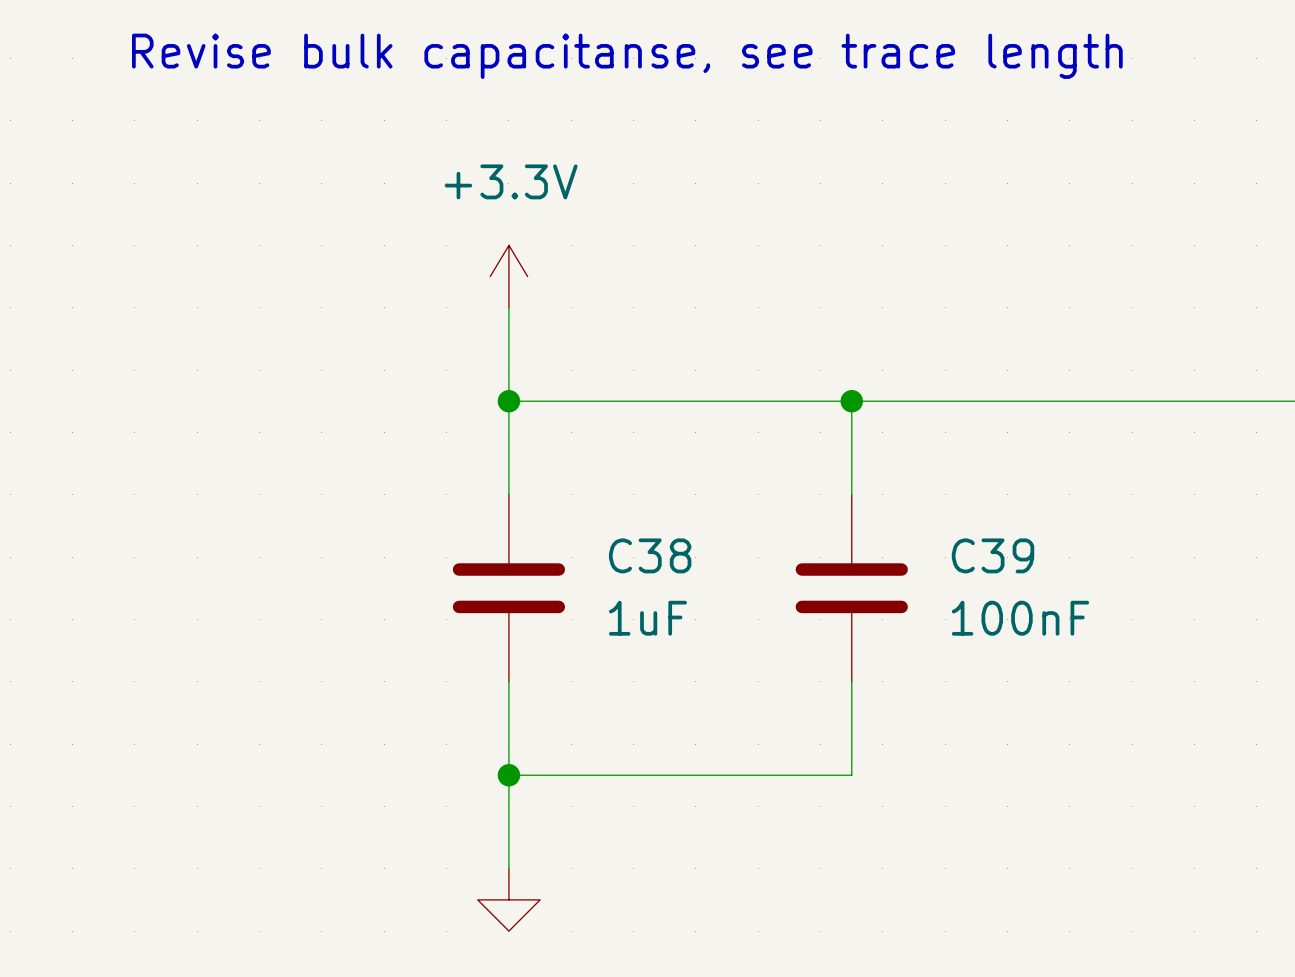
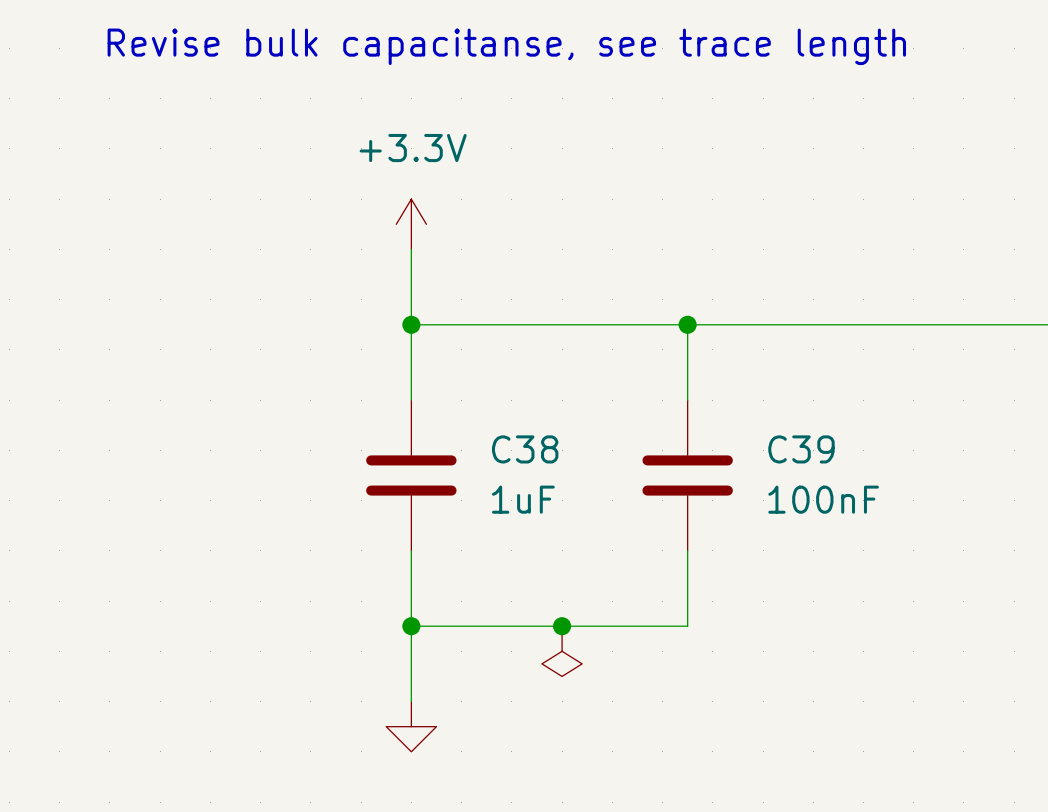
junction: none -> (562, 626)
power symbol: none -> (562, 651)

